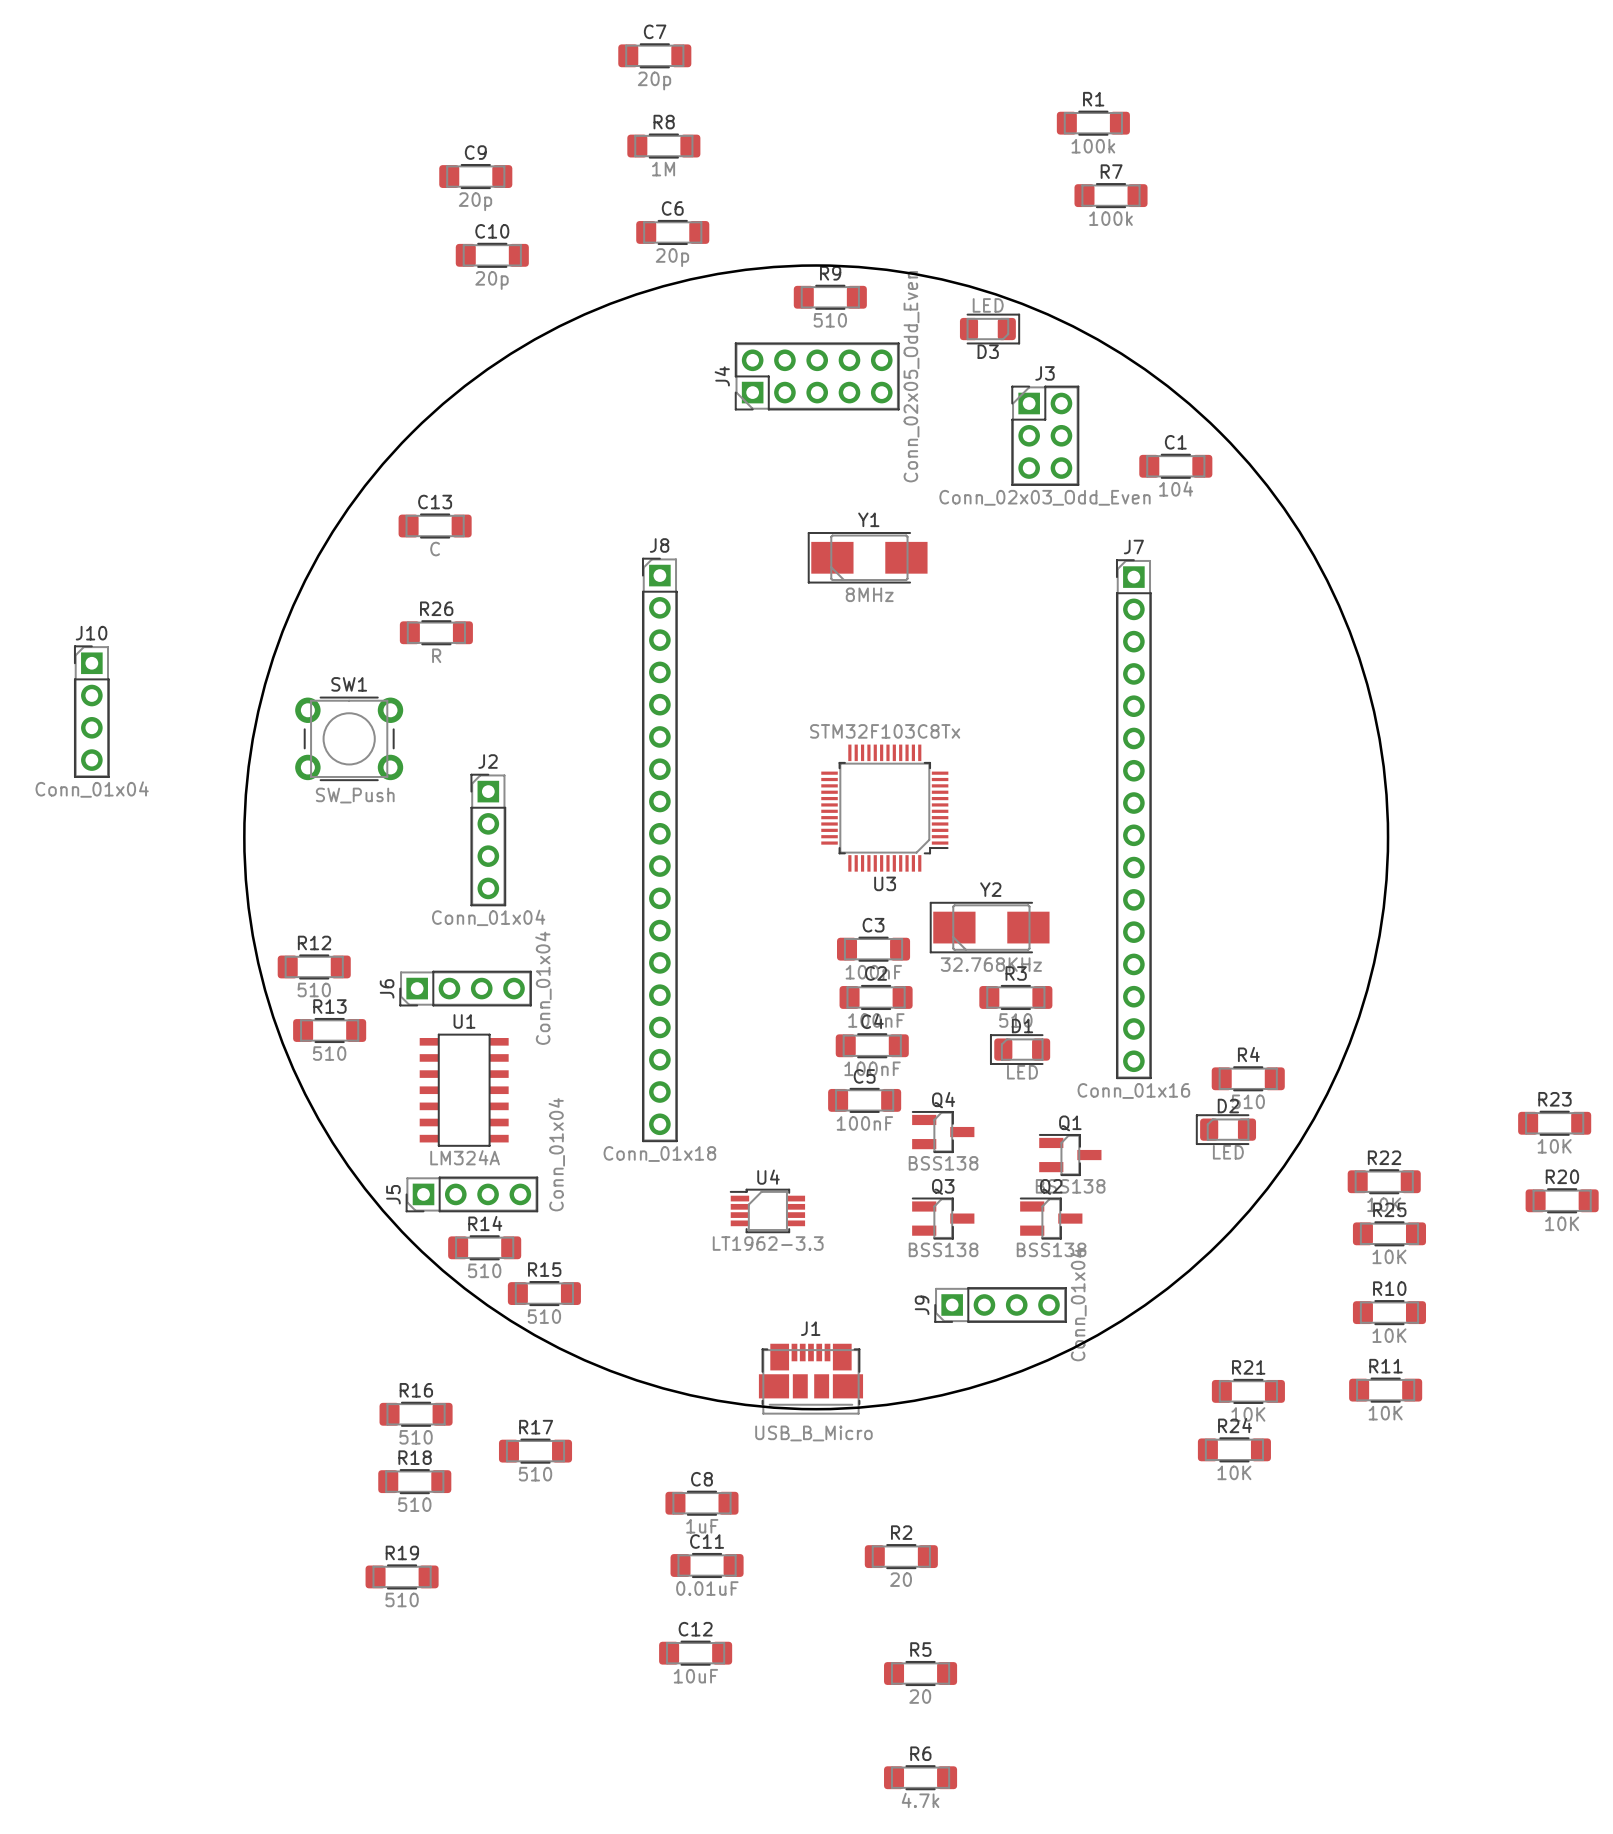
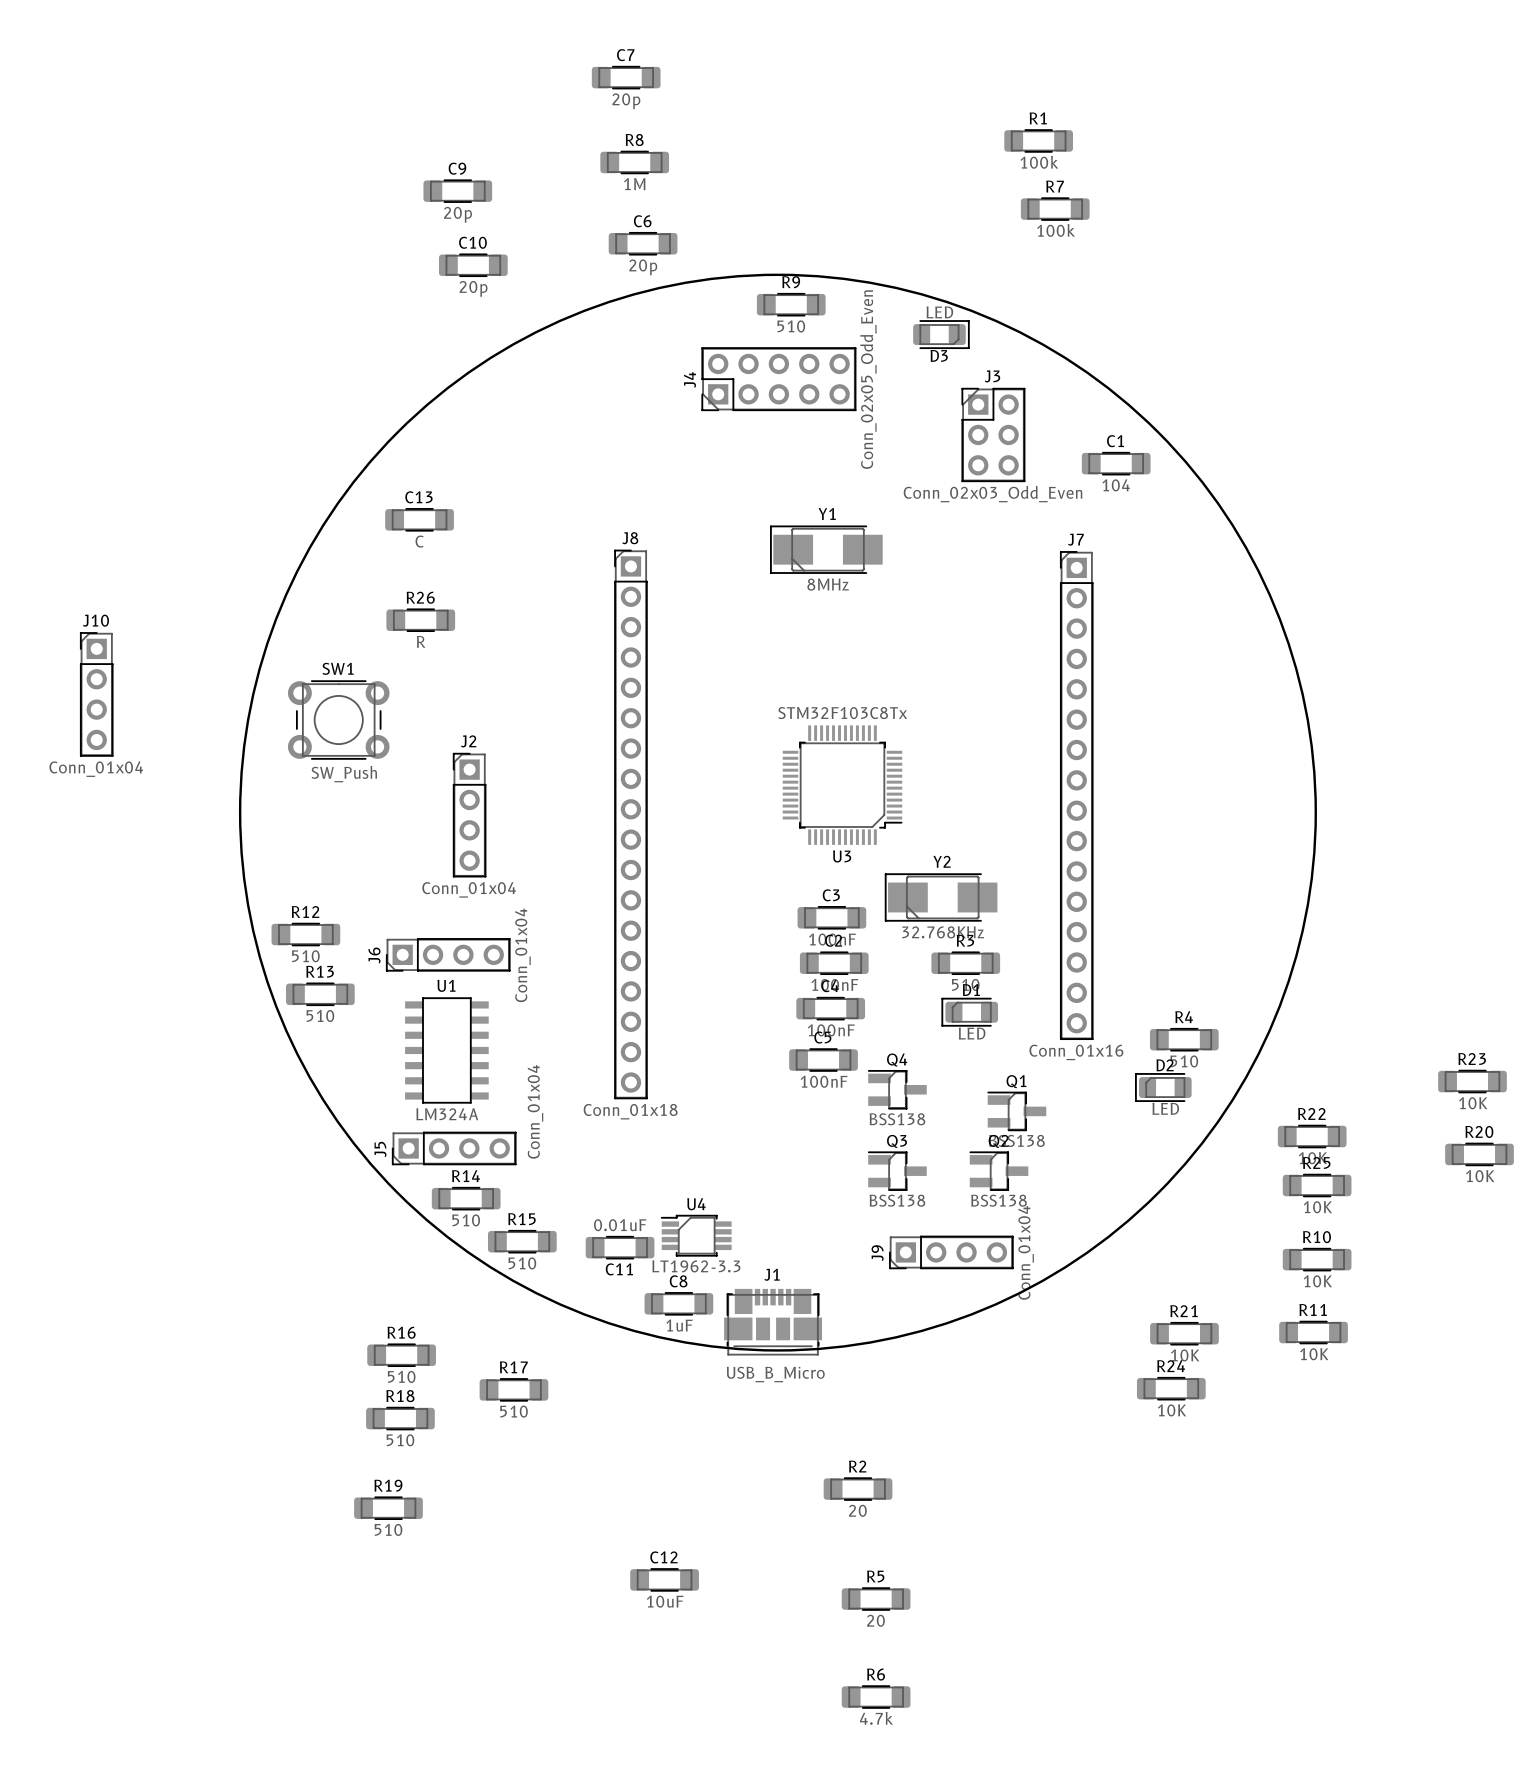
U4 position: (767, 1210) -> (696, 1235)
C8 position: (701, 1503) -> (678, 1303)
C11 name position: C11 (707, 1541) -> C11 (619, 1269)
C11 position: (707, 1565) -> (620, 1247)
C11 value position: 0.01uF (707, 1588) -> 0.01uF (620, 1225)

